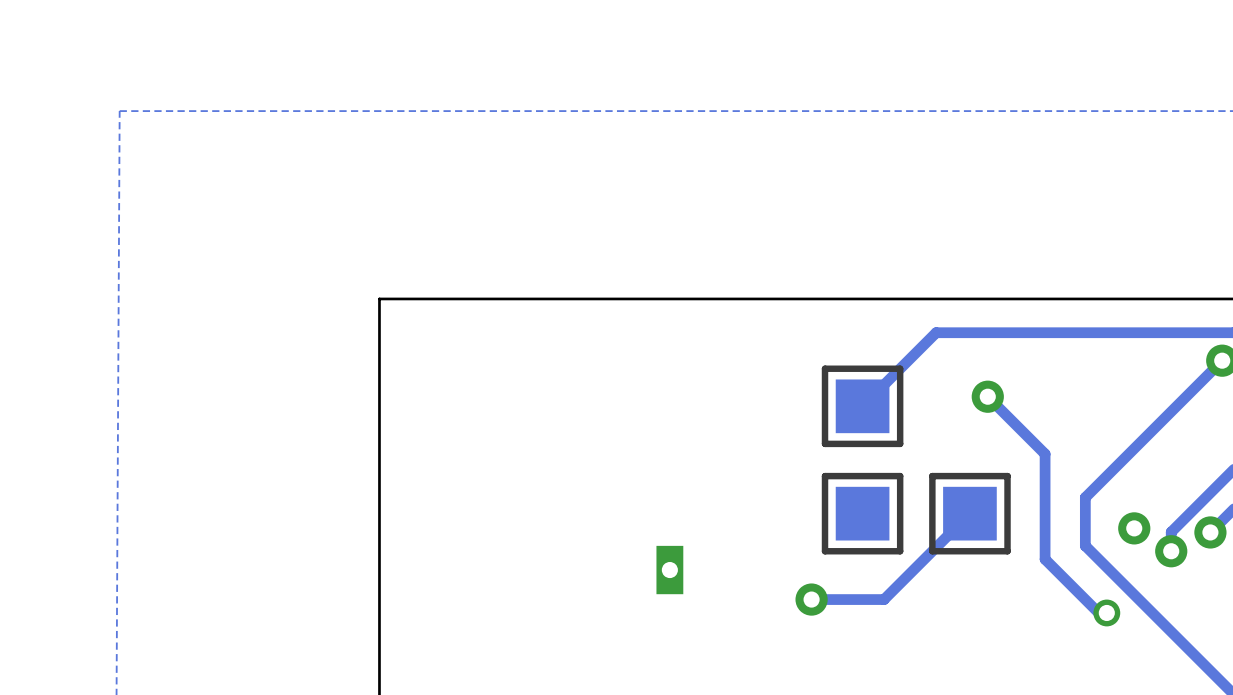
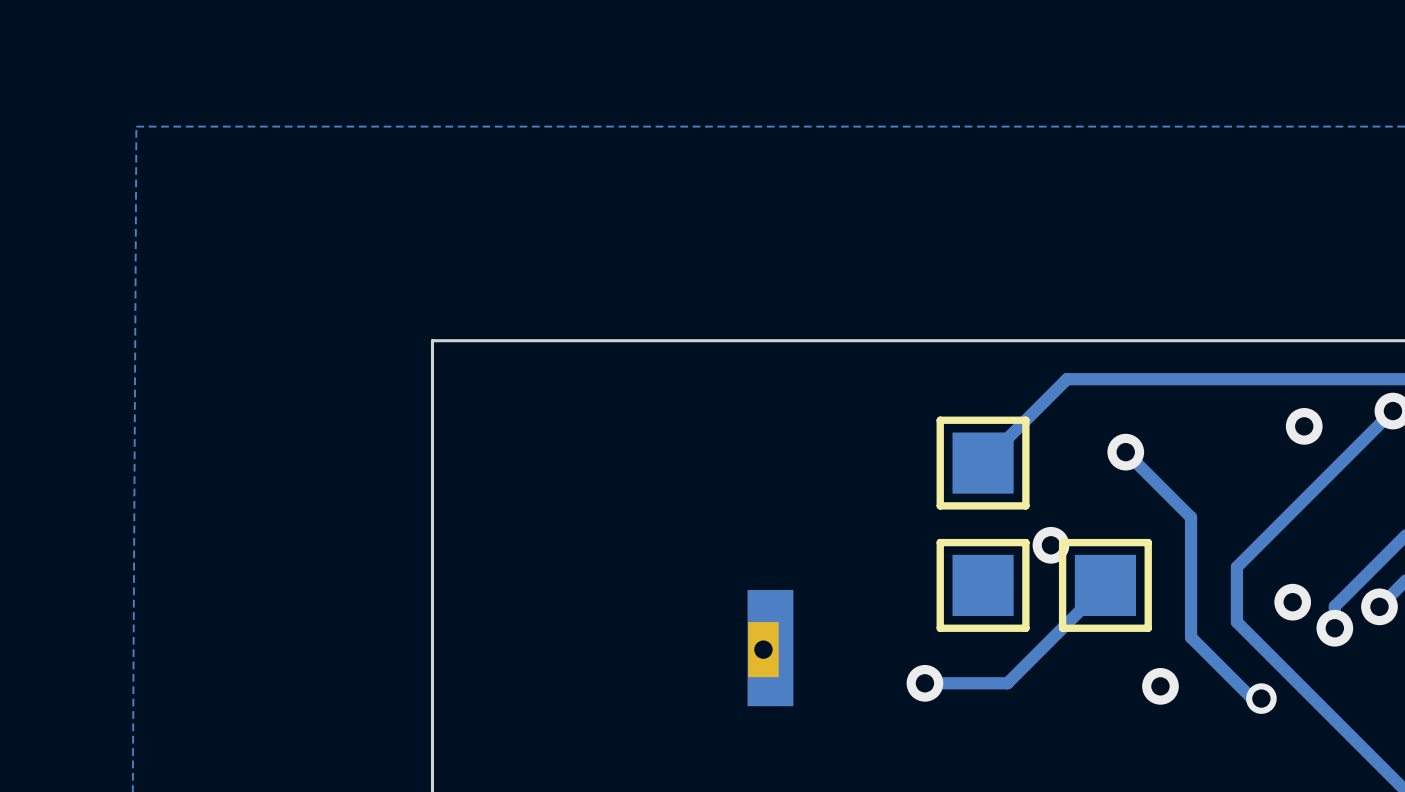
via: none -> (1304, 426)
via: none -> (1050, 545)
drawing: none -> [747, 590, 794, 707]
via: none -> (1160, 686)

